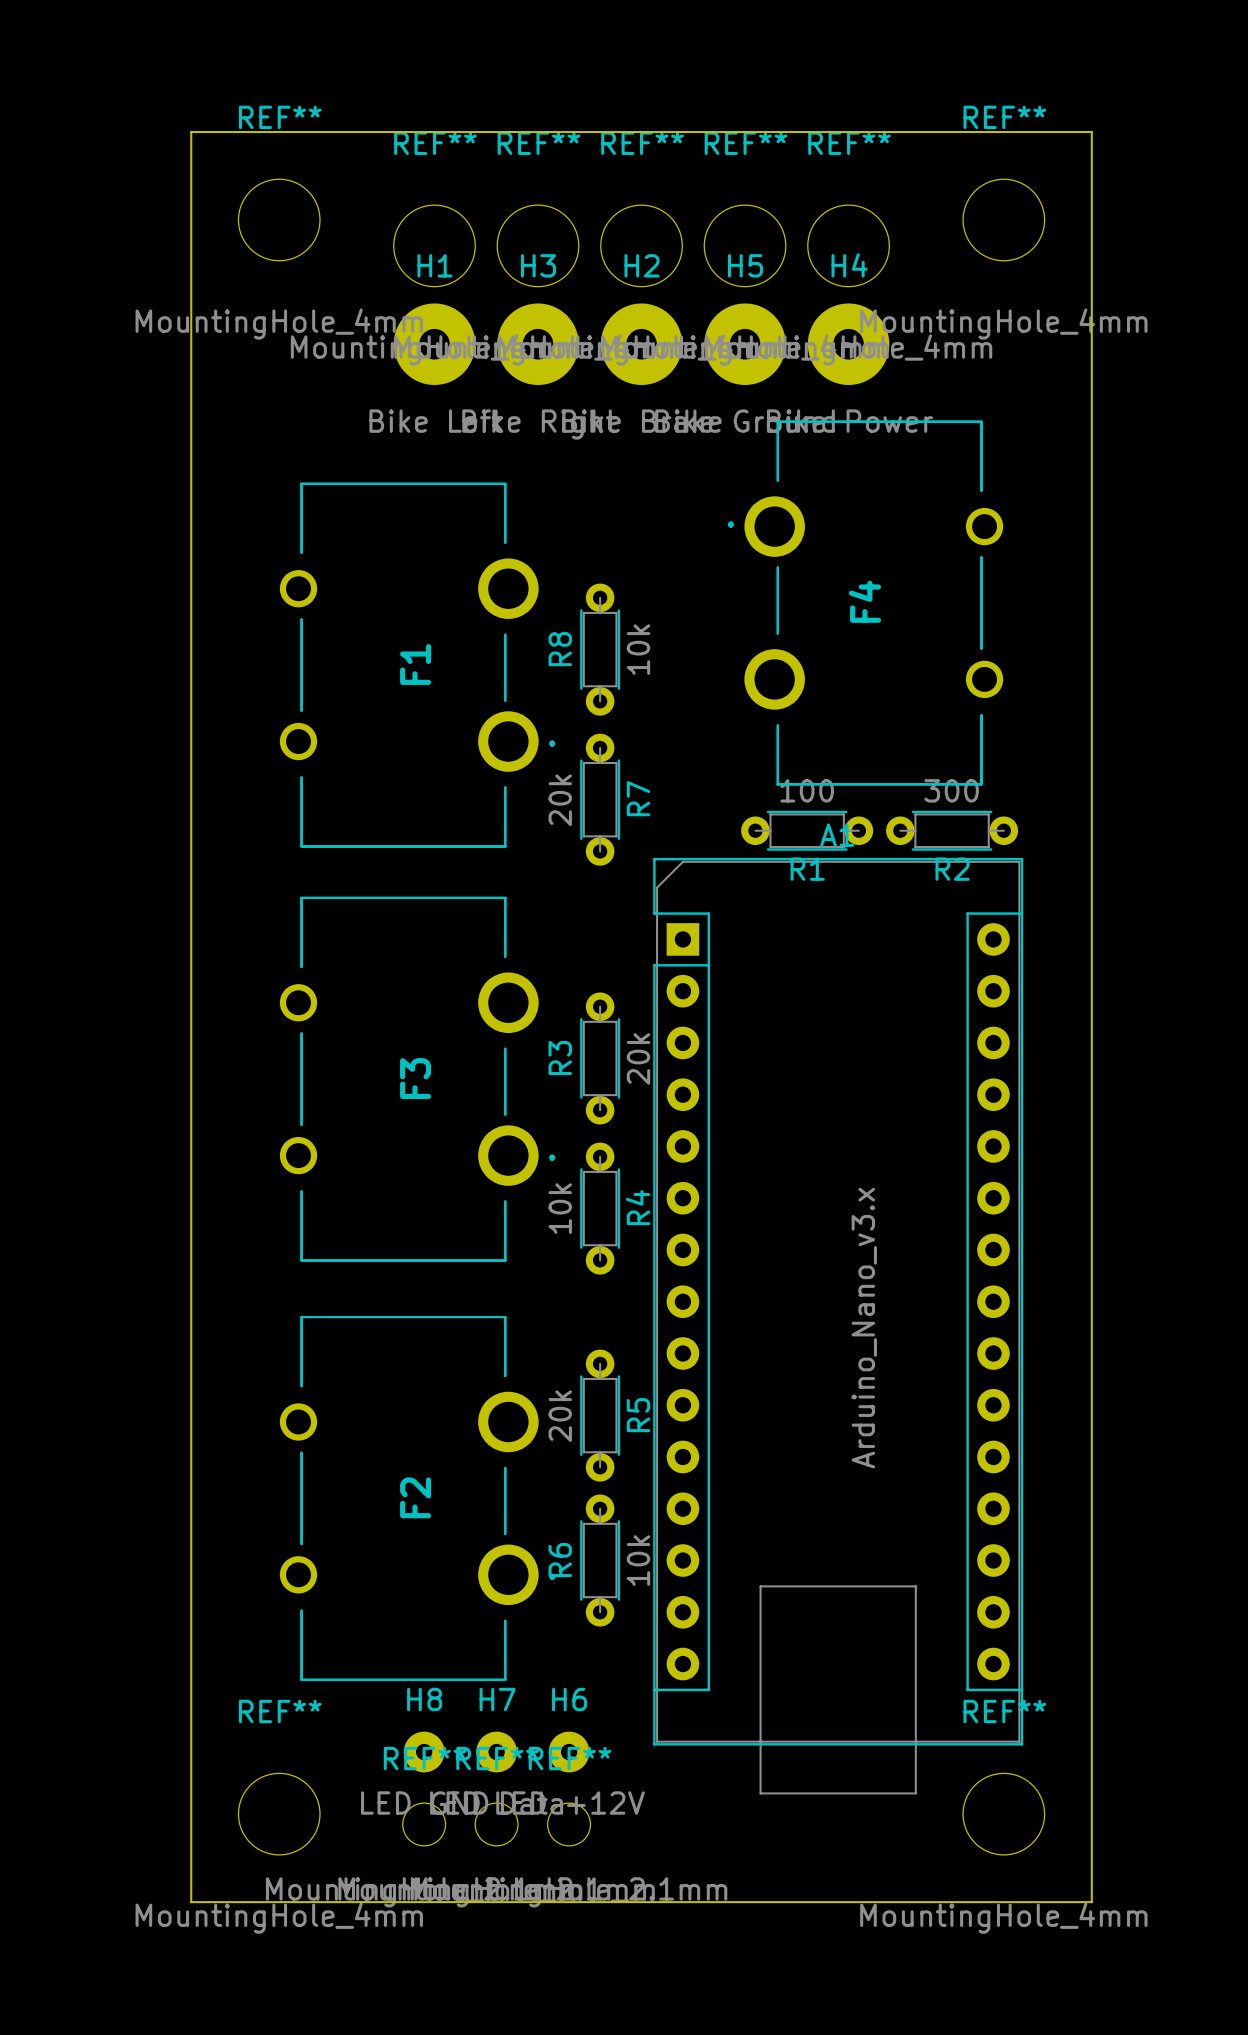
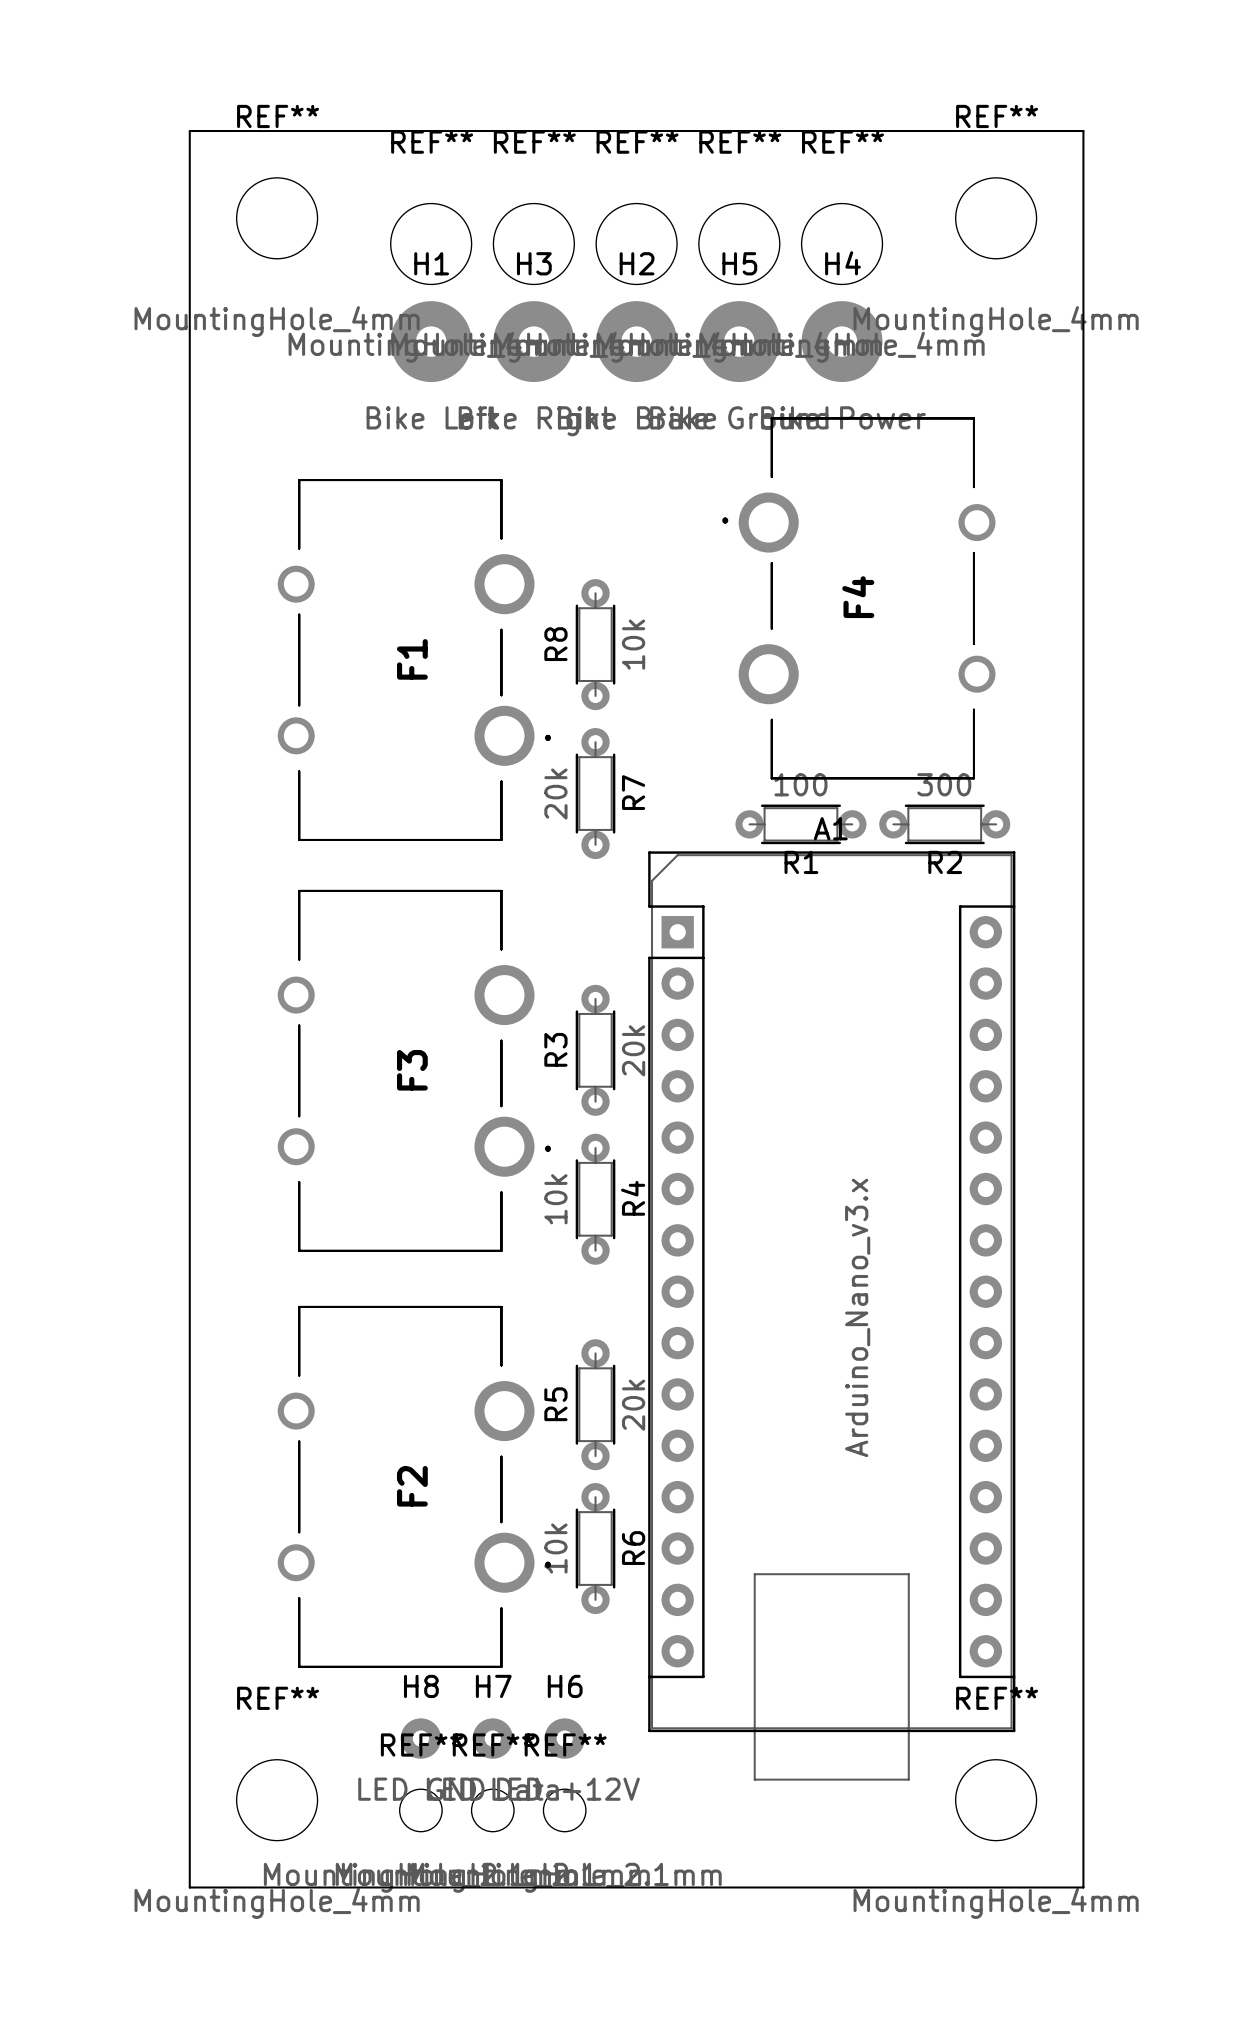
R5 name position: R5 (638, 1415) -> R5 (555, 1404)
R5 value position: 20k (560, 1416) -> 20k (633, 1405)
R6 name position: R6 (560, 1560) -> R6 (633, 1548)
R6 value position: 10k (638, 1560) -> 10k (555, 1548)

